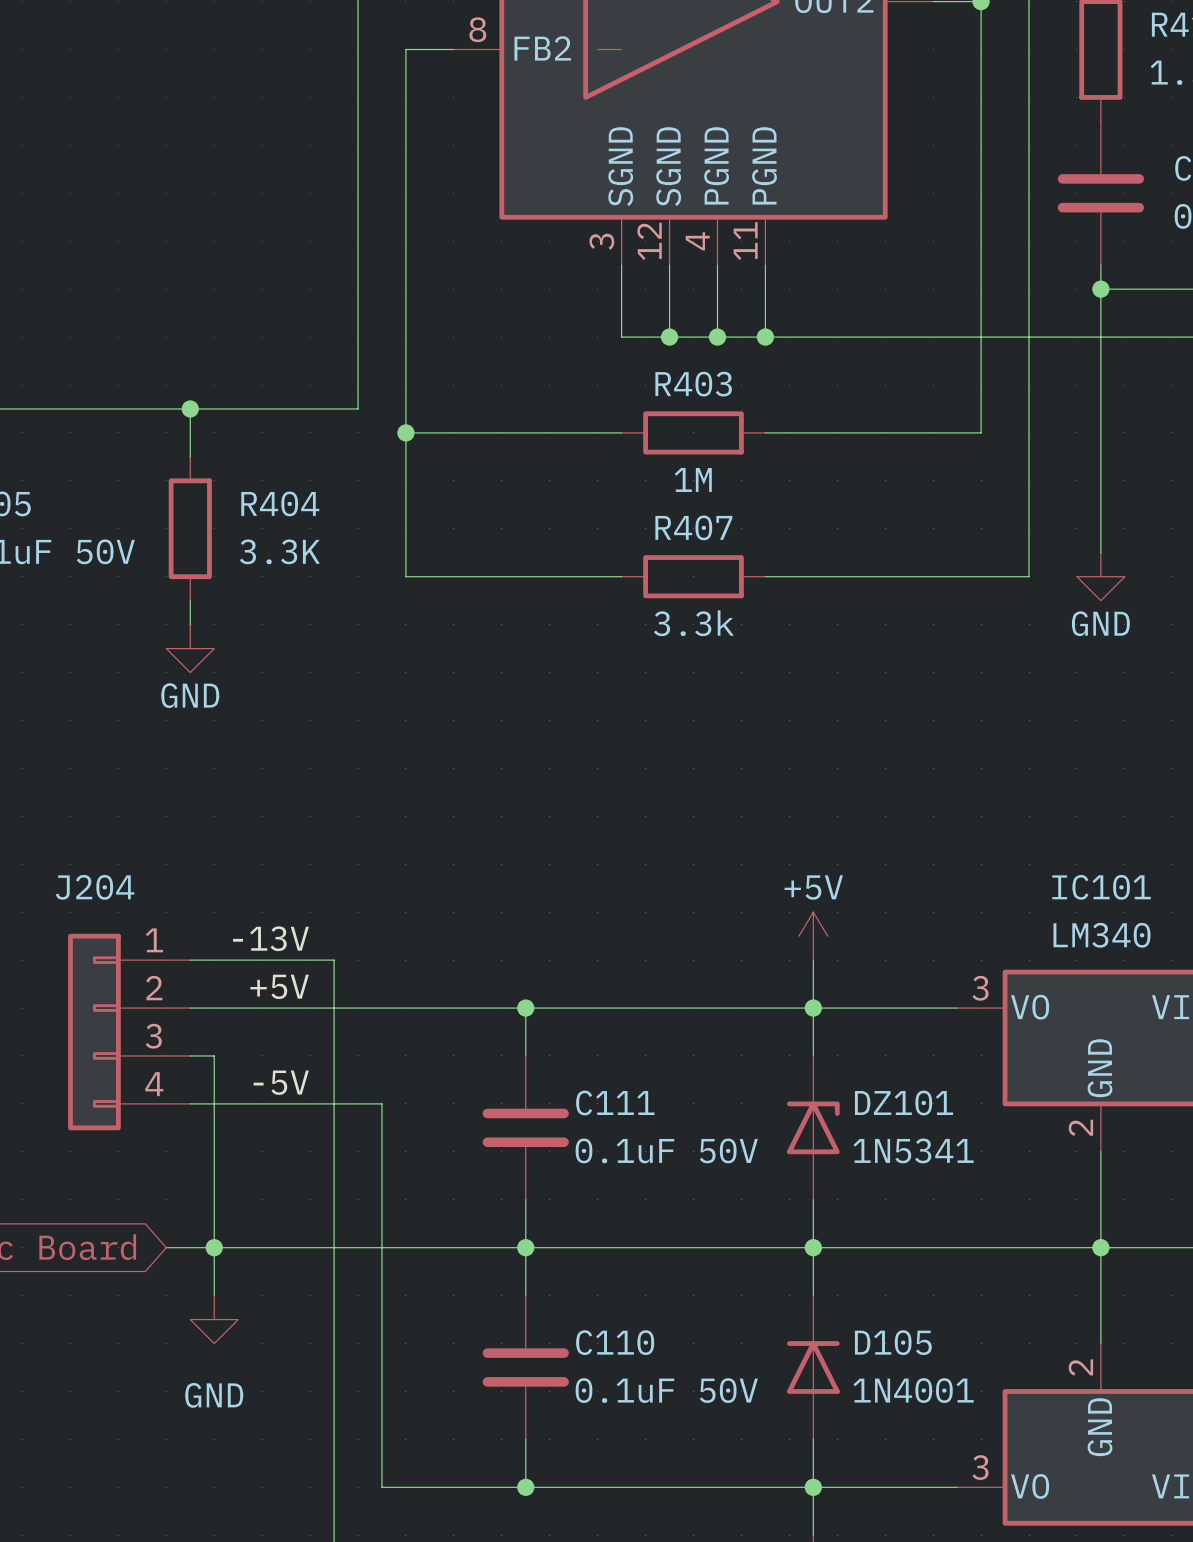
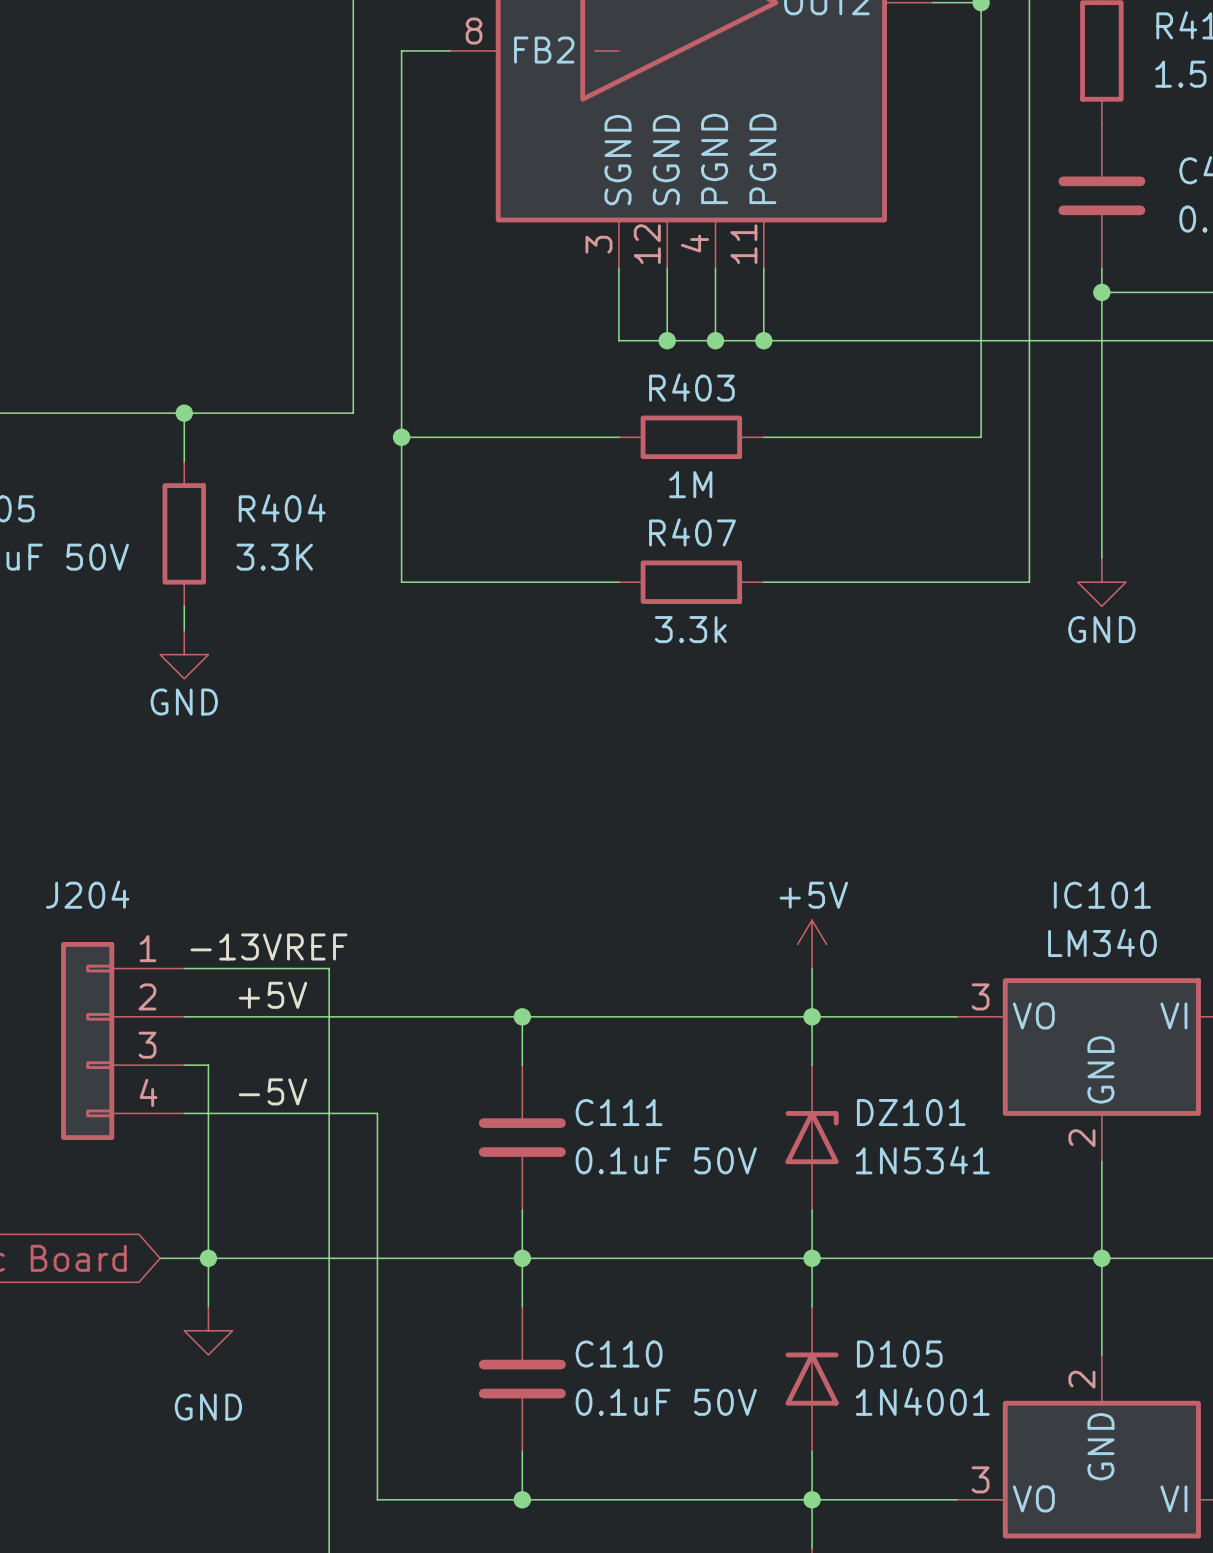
label: -13V (270, 938) -> -13VREF (268, 947)
label position: +5V (279, 986) -> +5V (272, 995)
label position: -5V (281, 1082) -> -5V (272, 1091)

